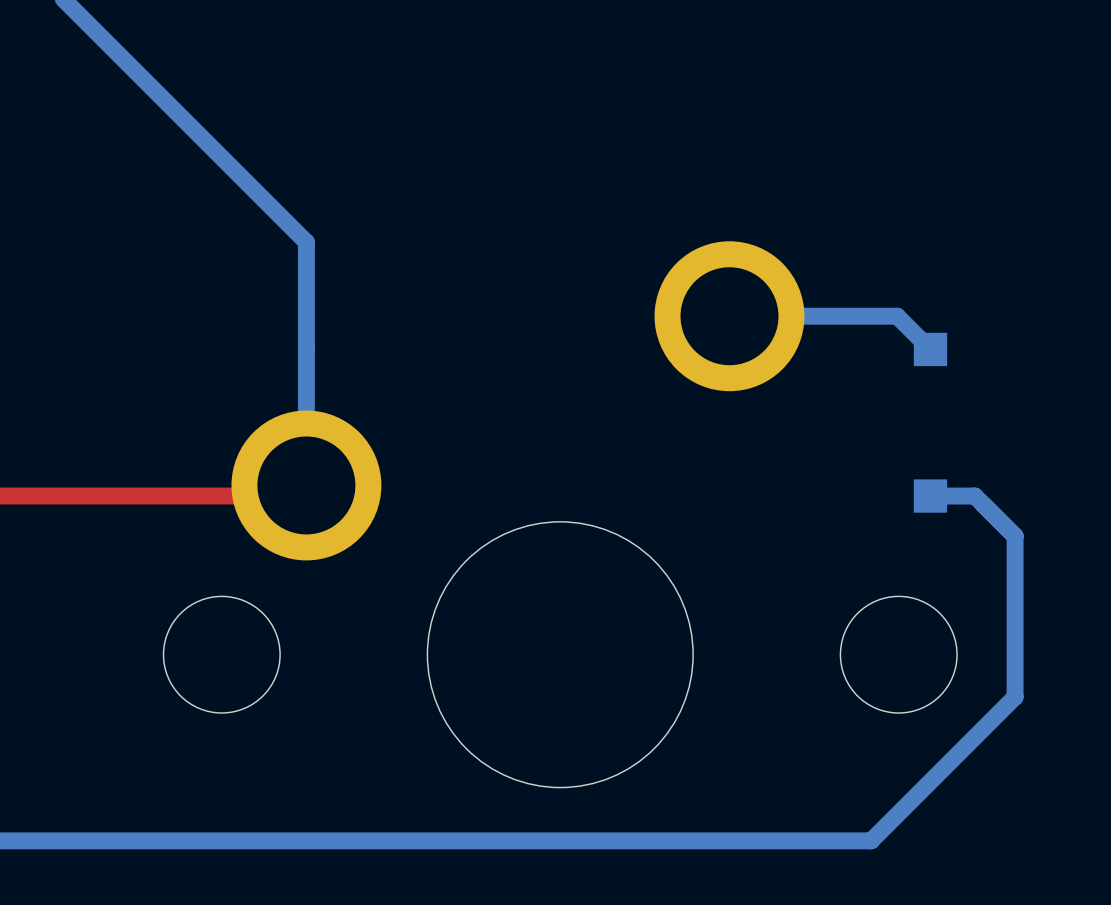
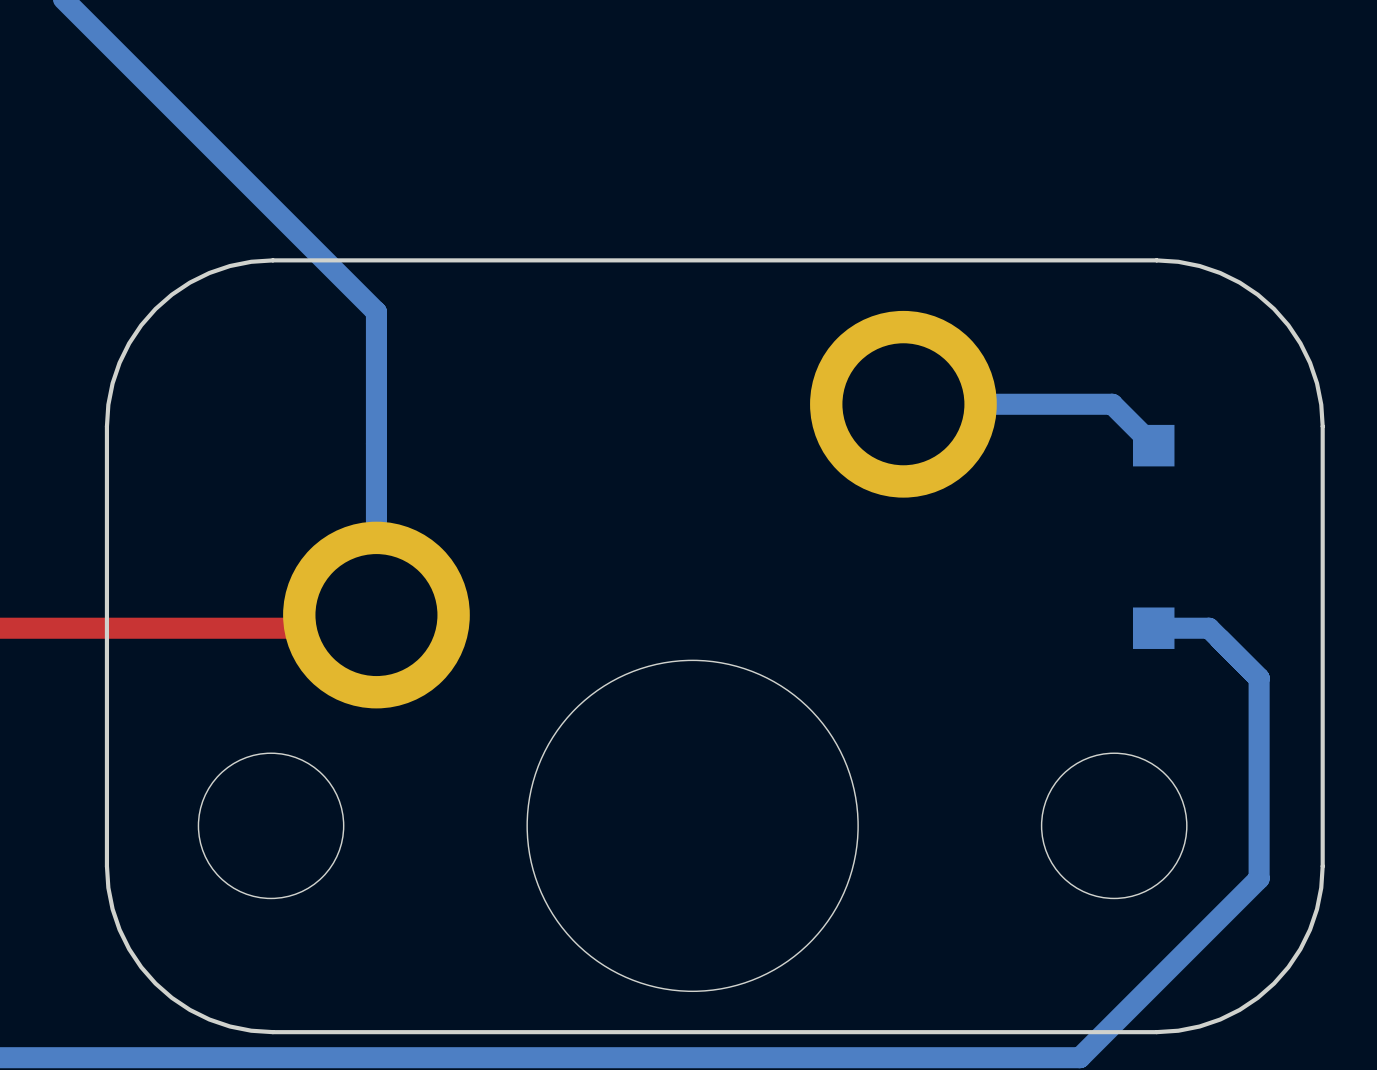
board edge: none -> (272, 260) (1156, 260) (1178, 261) (1220, 273) (1257, 294) (1288, 325) (1300, 343) (1317, 383) (1322, 426) (1322, 866) (1317, 909) (1300, 949) (1288, 967) (1257, 997) (1220, 1019) (1178, 1030) (1156, 1032) (272, 1032) (251, 1030) (209, 1019) (171, 997) (141, 967) (129, 949) (112, 909) (108, 887) (108, 404) (112, 383) (129, 343) (141, 325) (171, 294) (209, 273) (251, 261) (272, 260)

